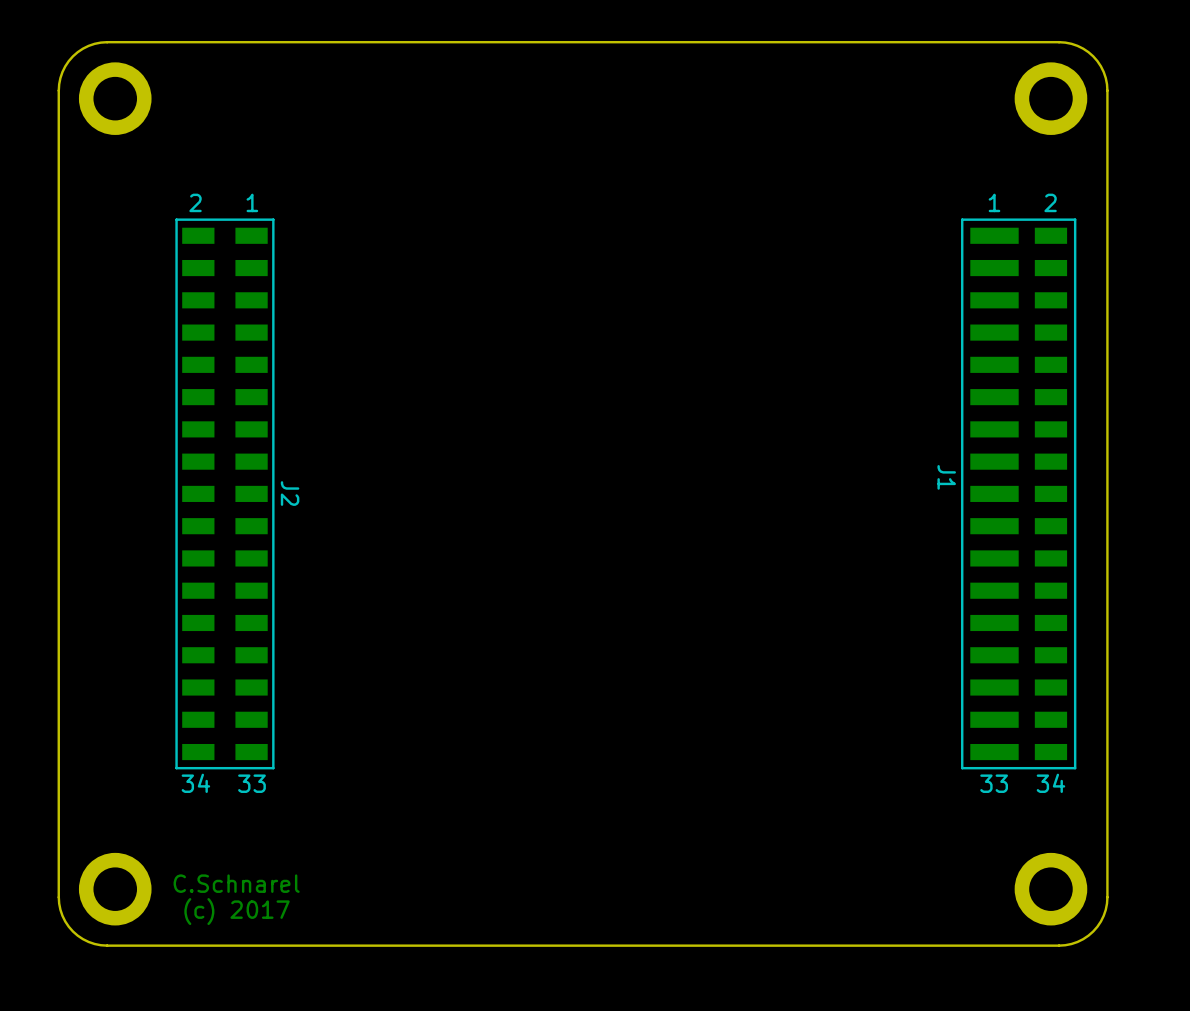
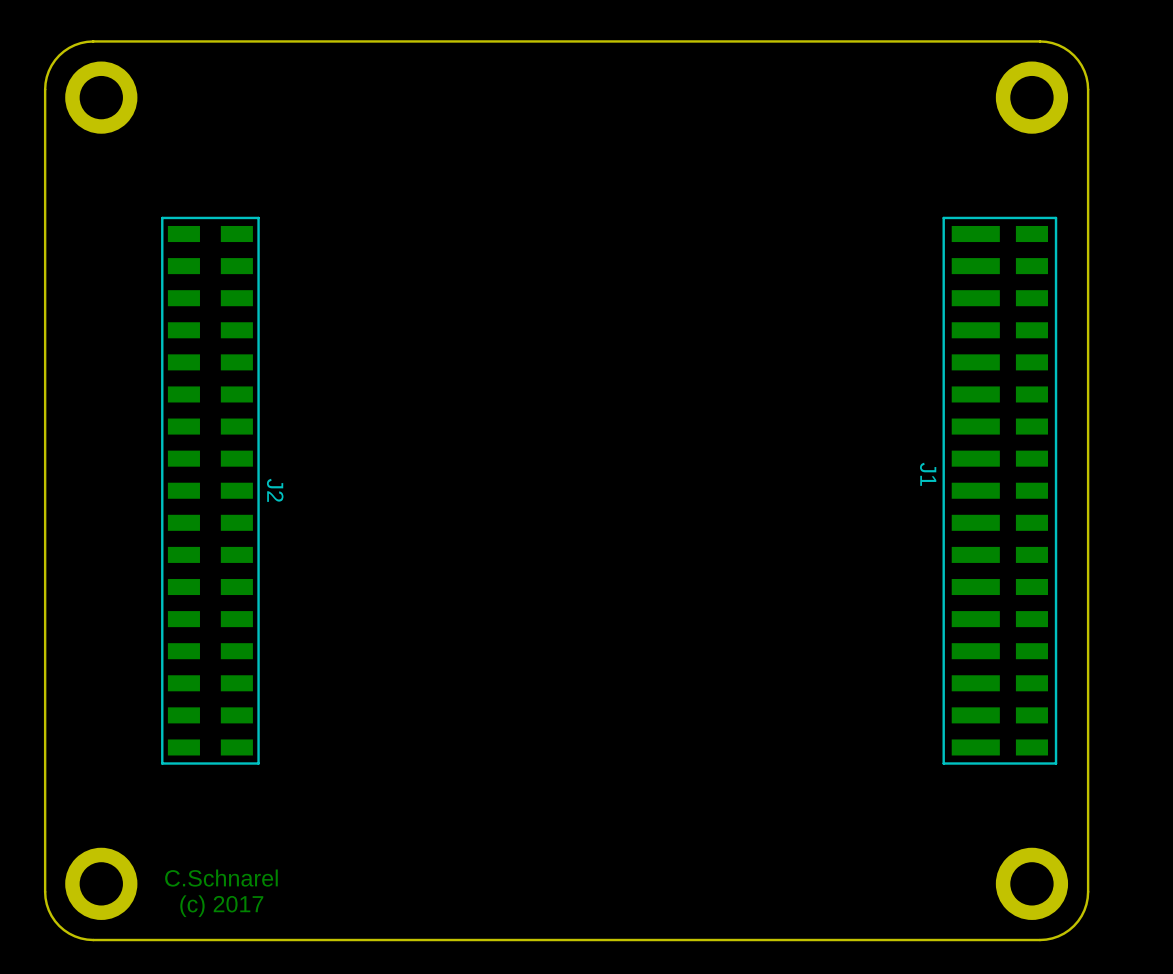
text: 2 (195, 202) -> none
text: 1 (252, 202) -> none
text: 1 (994, 202) -> none
text: 2 (1050, 202) -> none
text: 34 (195, 783) -> none
text: 33 (251, 783) -> none
text: 33 (994, 783) -> none
text: 34 (1050, 783) -> none

